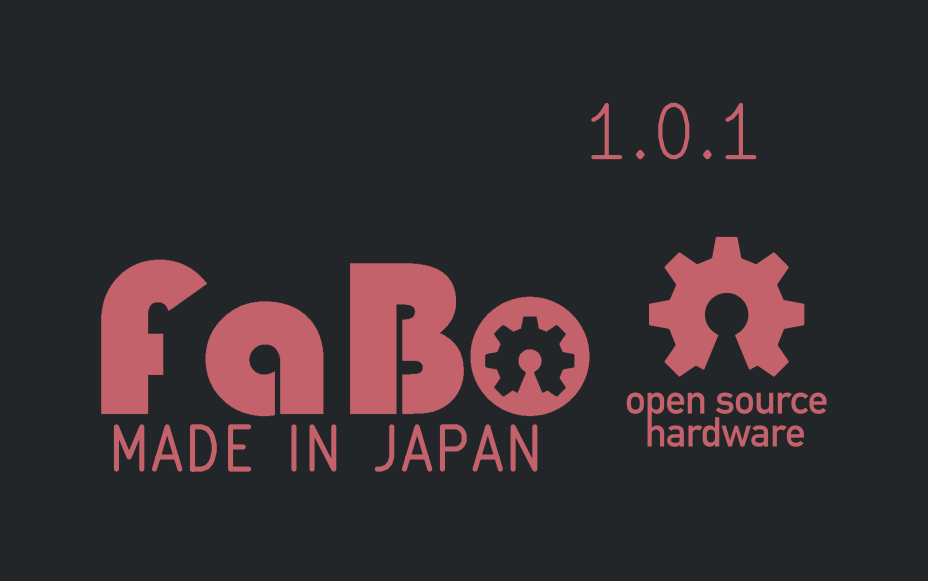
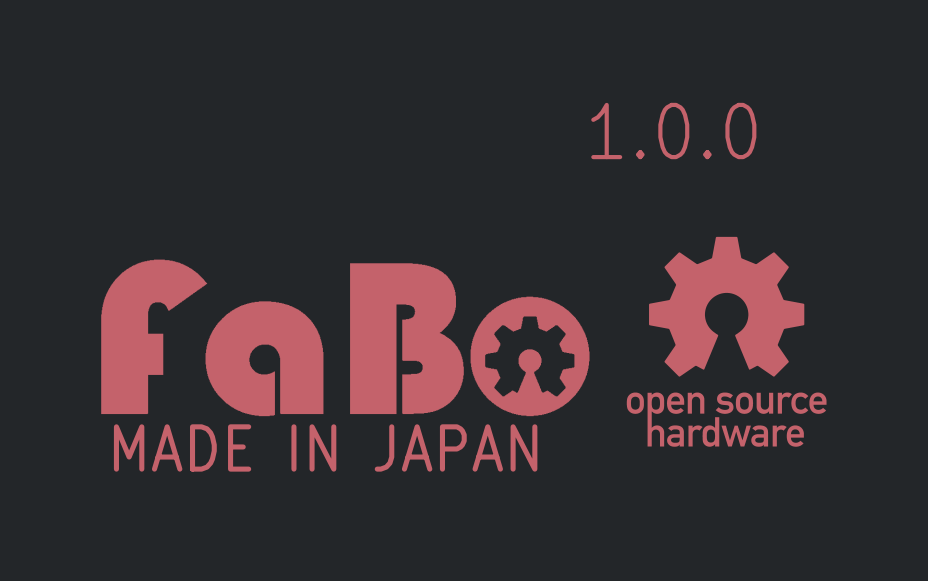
text: 1.0.1 (673, 131) -> 1.0.0 (673, 131)

